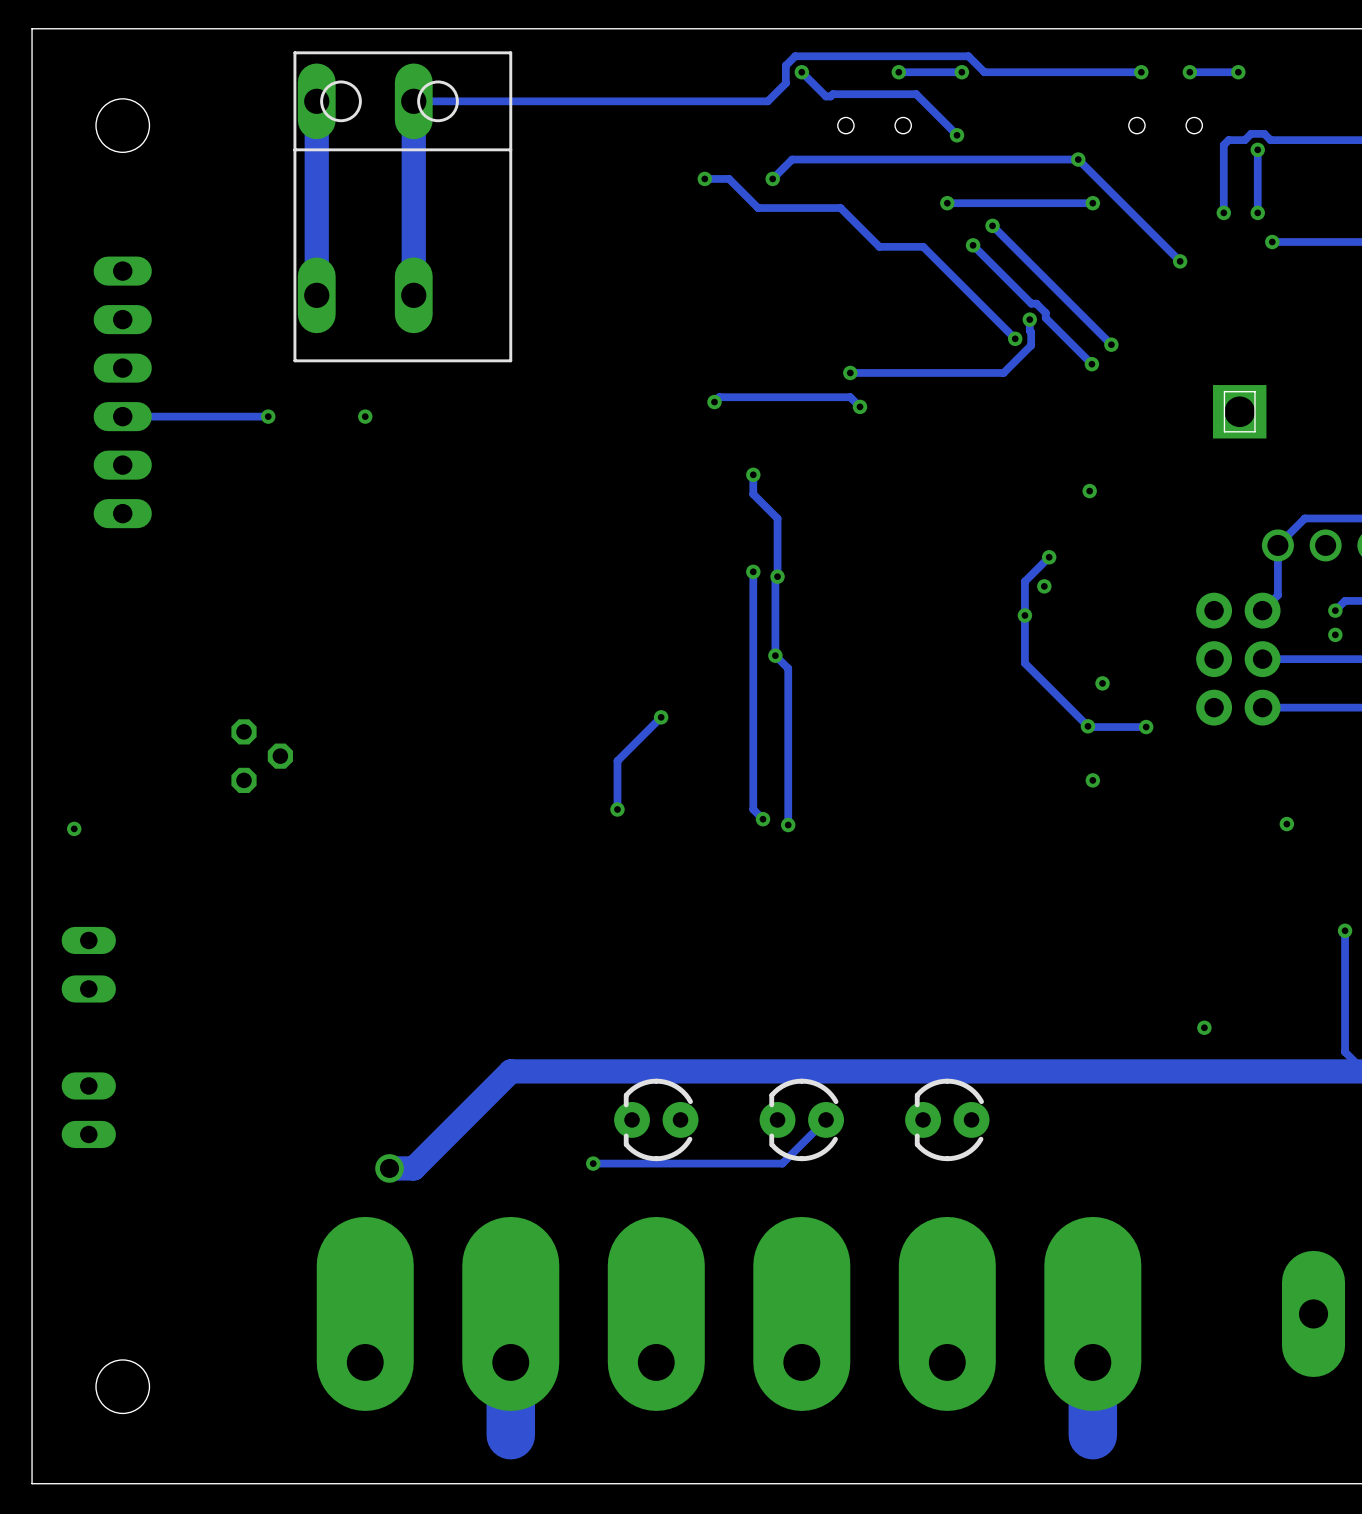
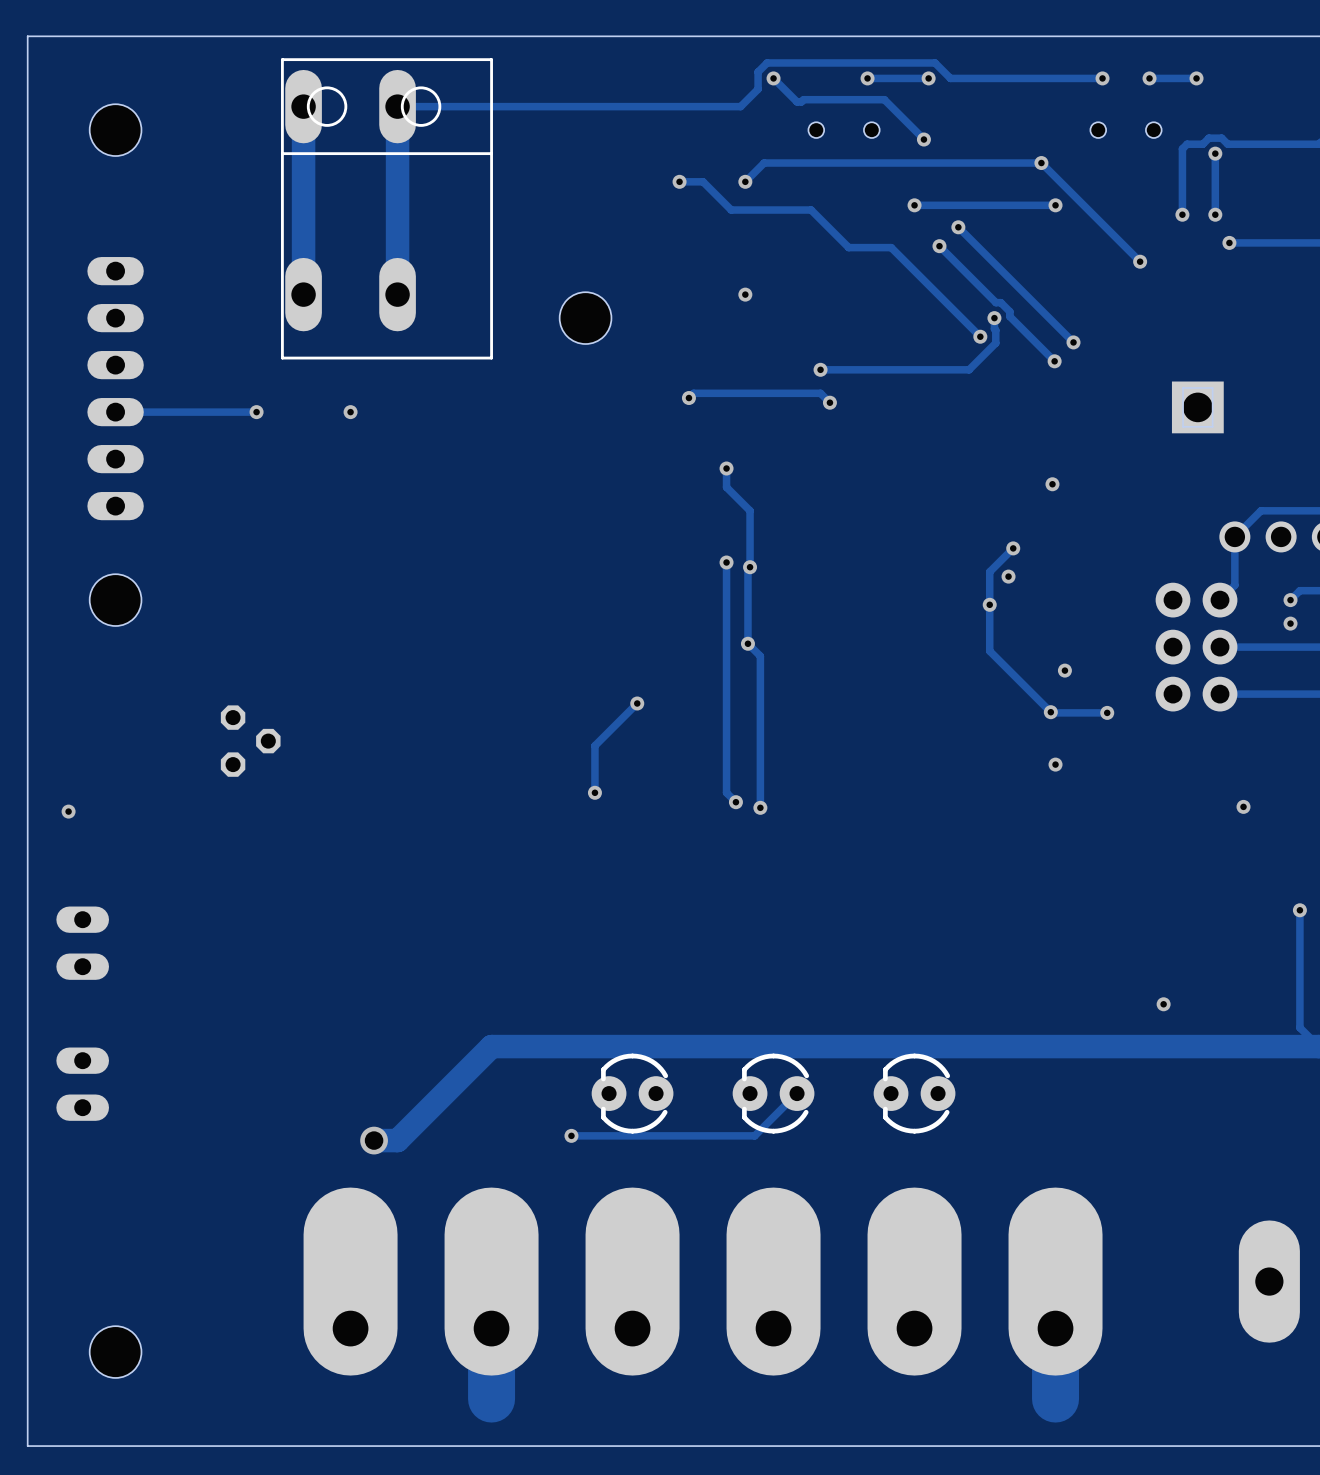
via: none -> (745, 294)
part: none -> (585, 318)
part: none -> (115, 600)

